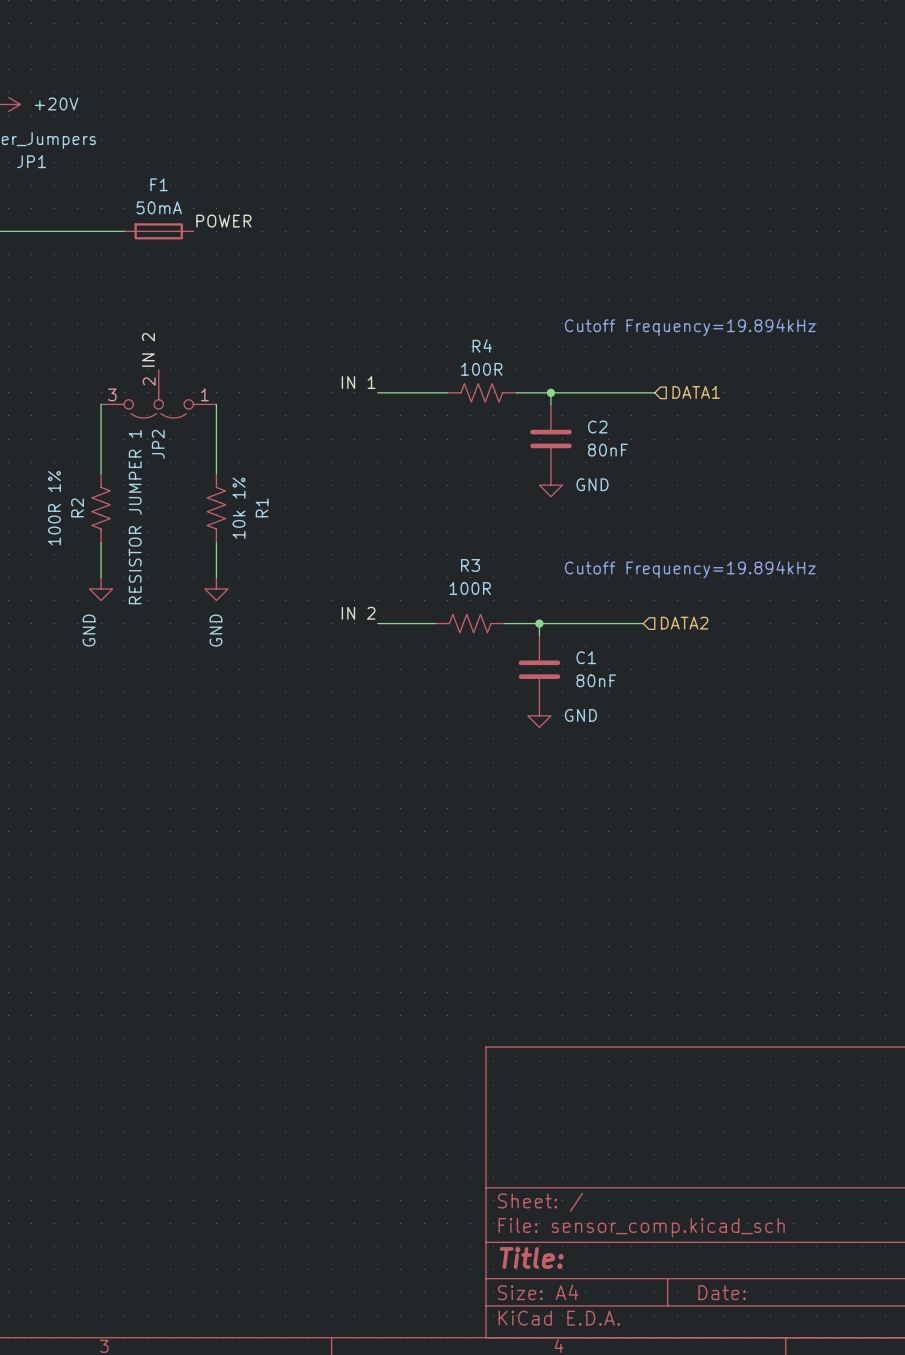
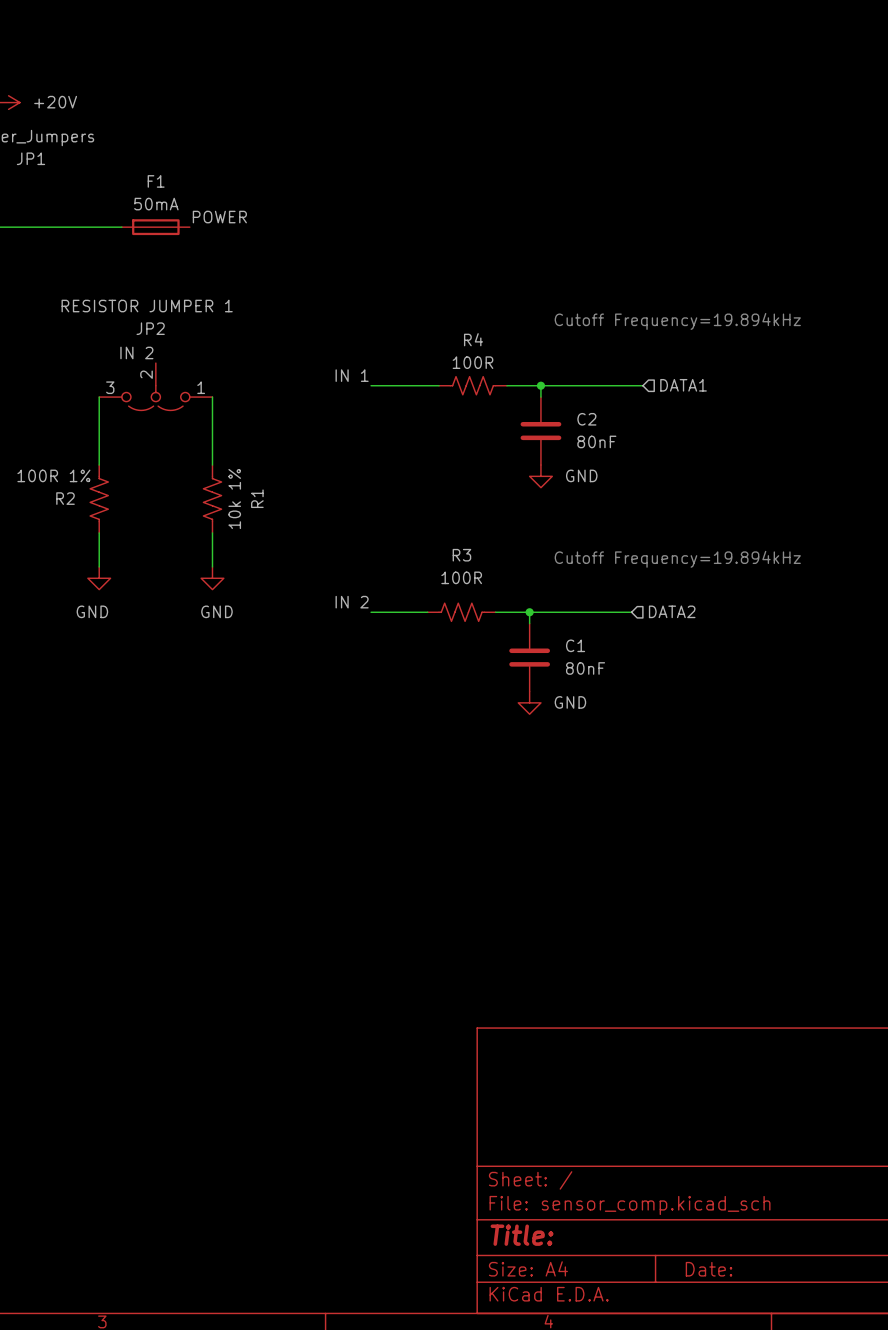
label rotation: 0° (148, 349) -> 90° clockwise (136, 352)
JP2 name rotation: 0° (158, 444) -> 90° clockwise (150, 328)
JP2 name position: JP2 (158, 444) -> JP2 (150, 328)
R2 name rotation: 0° (77, 507) -> 90° clockwise (65, 498)
R2 value rotation: 0° (54, 508) -> 90° clockwise (53, 475)
JP2 value rotation: 0° (135, 517) -> 90° clockwise (147, 306)
JP2 value position: RESISTOR JUMPER 1 (135, 517) -> RESISTOR JUMPER 1 (147, 306)
power symbol text rotation: 0° (89, 630) -> 90° clockwise (216, 611)
power symbol text position: GND (89, 630) -> GND (216, 611)
power symbol text rotation: 0° (215, 630) -> 90° clockwise (92, 611)
power symbol text position: GND (215, 630) -> GND (92, 611)

